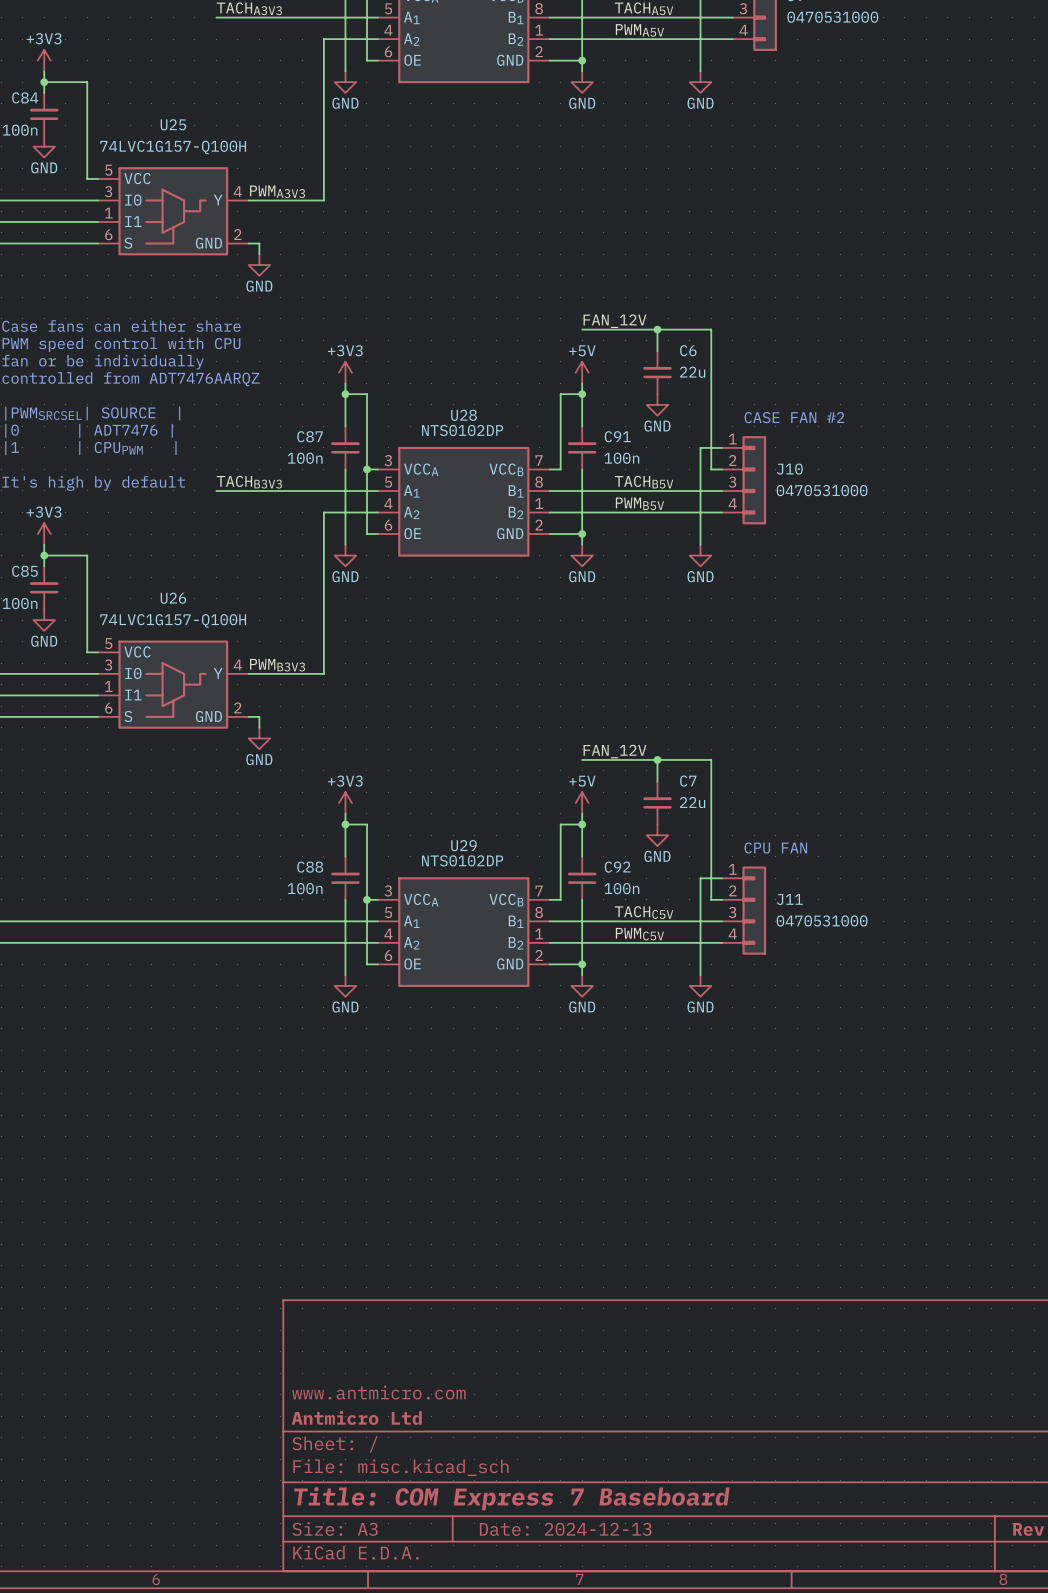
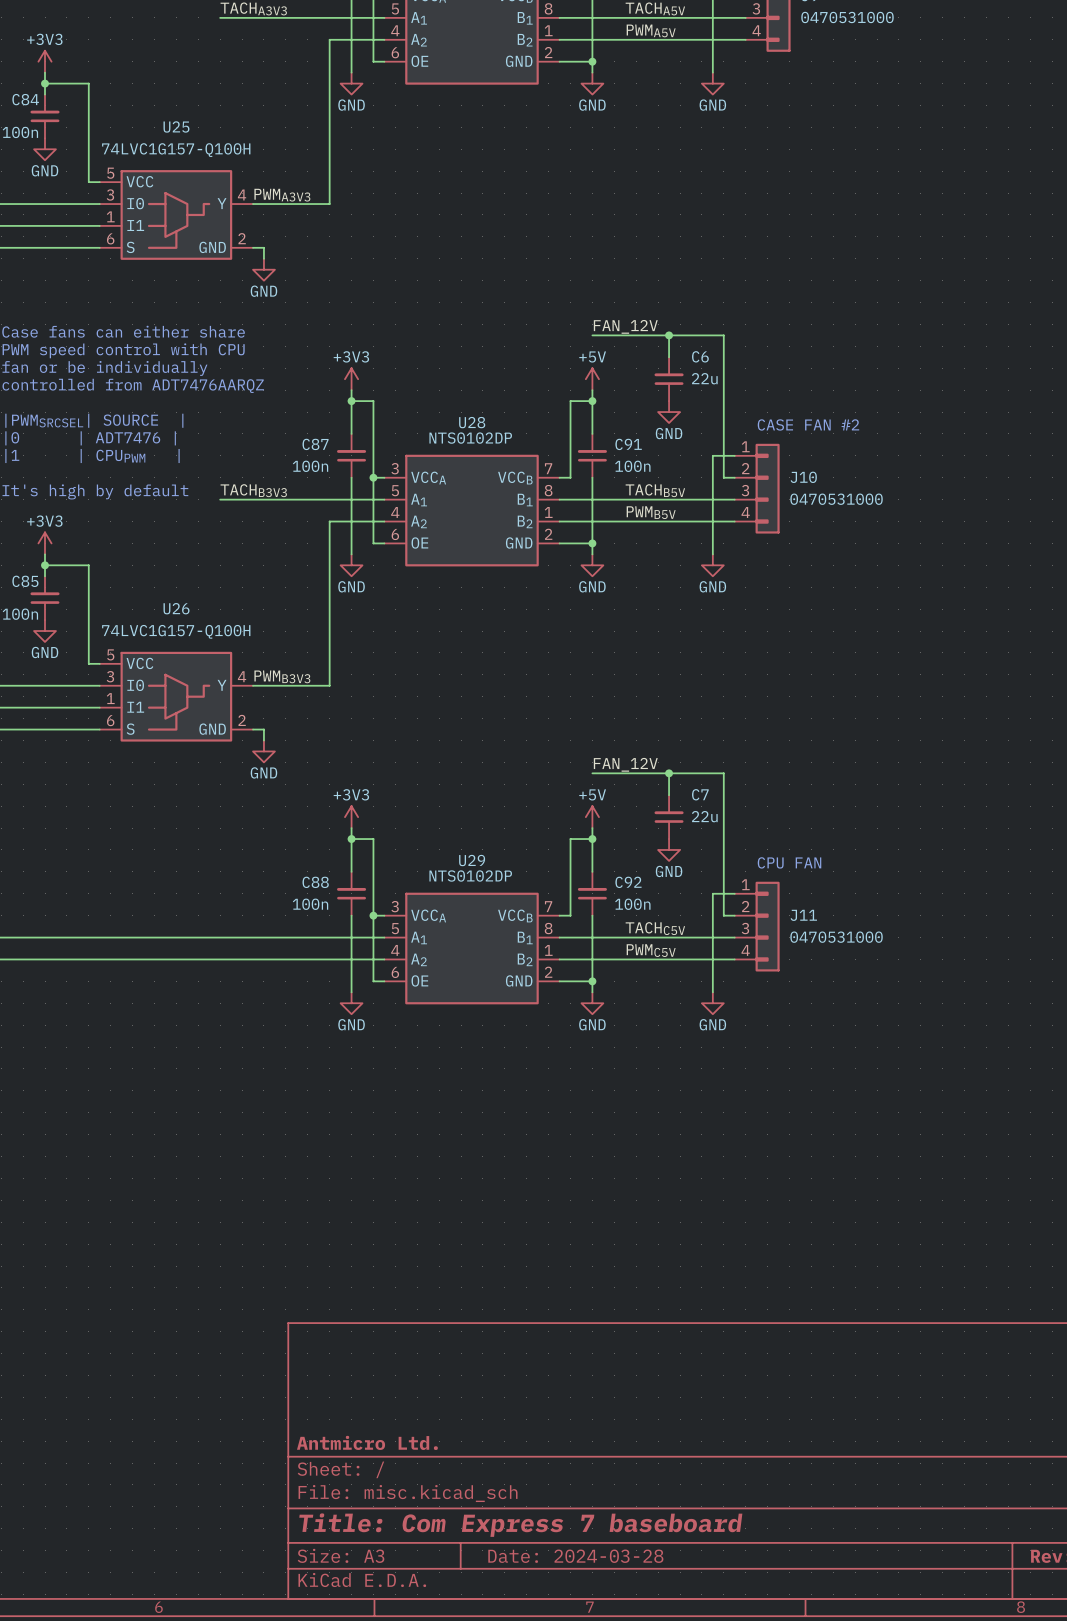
title block: www.antmicro.com (378, 1392) -> none
title block: Antmicro Ltd (356, 1417) -> Antmicro Ltd. (367, 1442)
title block: Title: COM Express 7 Baseboard (511, 1498) -> Title: Com Express 7 baseboard (520, 1525)
title block: Date: 2024-12-13 (565, 1529) -> Date: 2024-03-28 (575, 1556)

